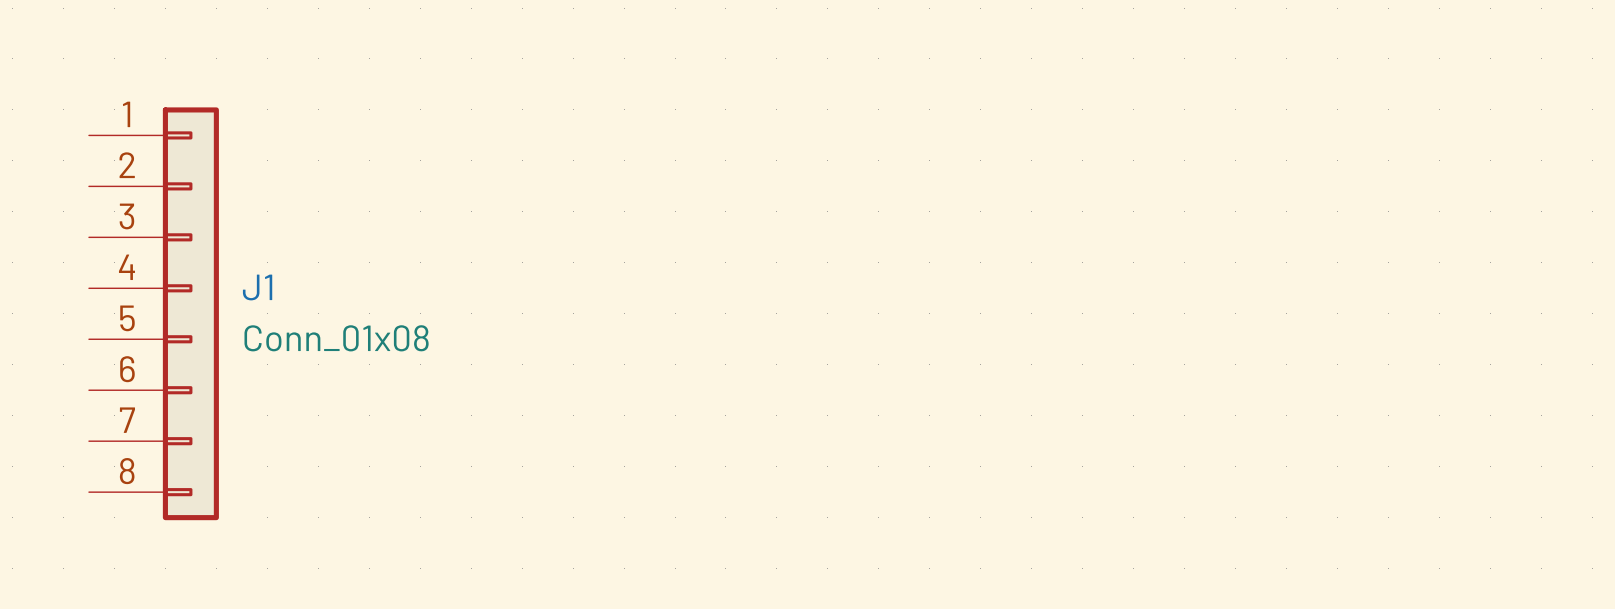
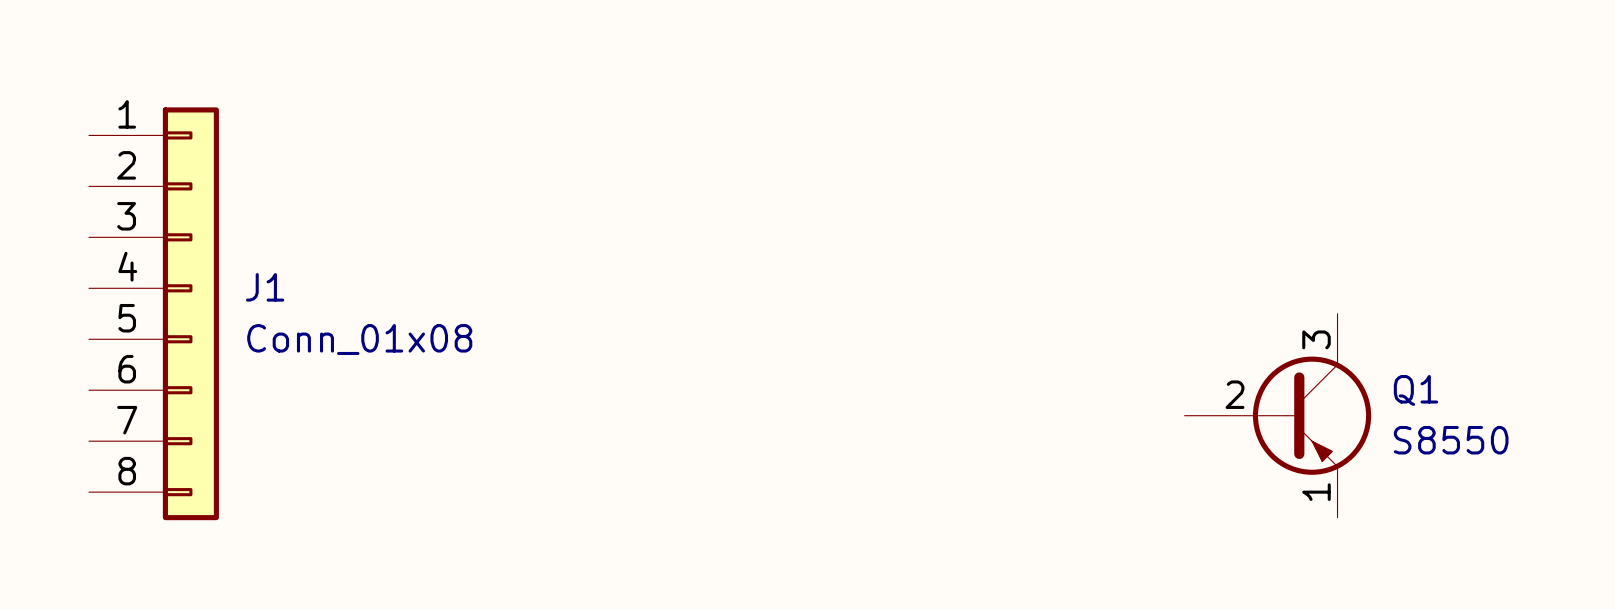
Q1: none -> S8550 (1277, 415)

